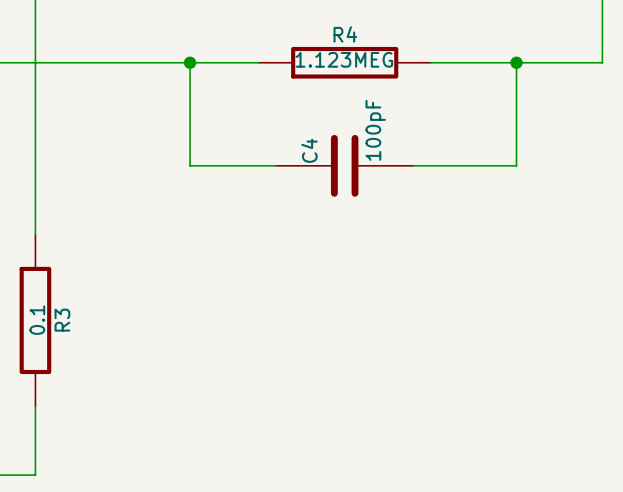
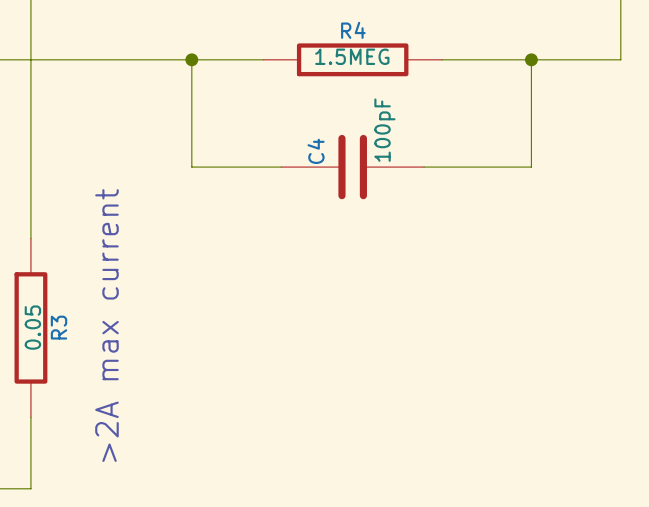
R4 value: 1.123MEG (344, 59) -> 1.5MEG (352, 56)
text: none -> >2A max current (106, 325)
R3 value: 0.1 (37, 320) -> 0.05 (32, 327)

